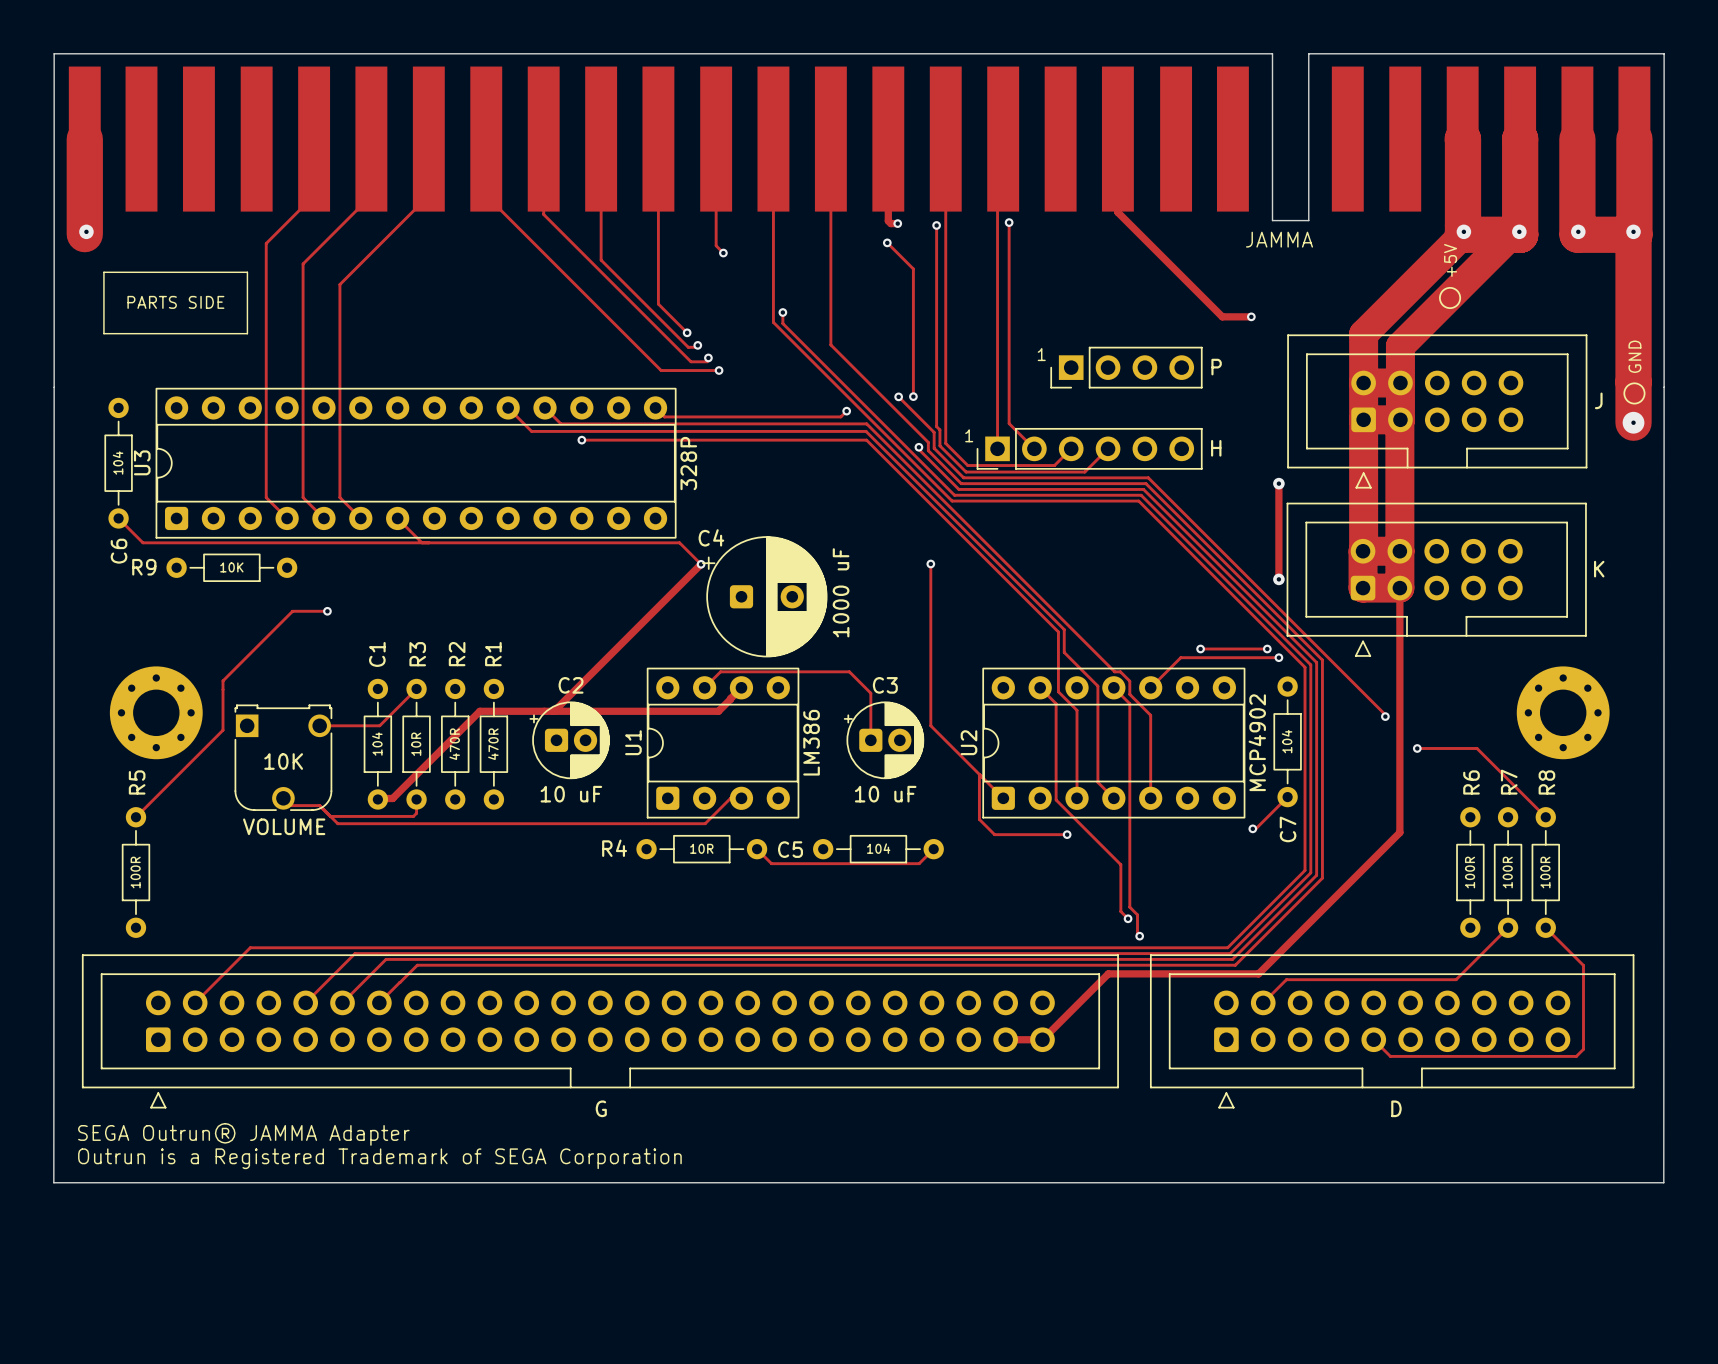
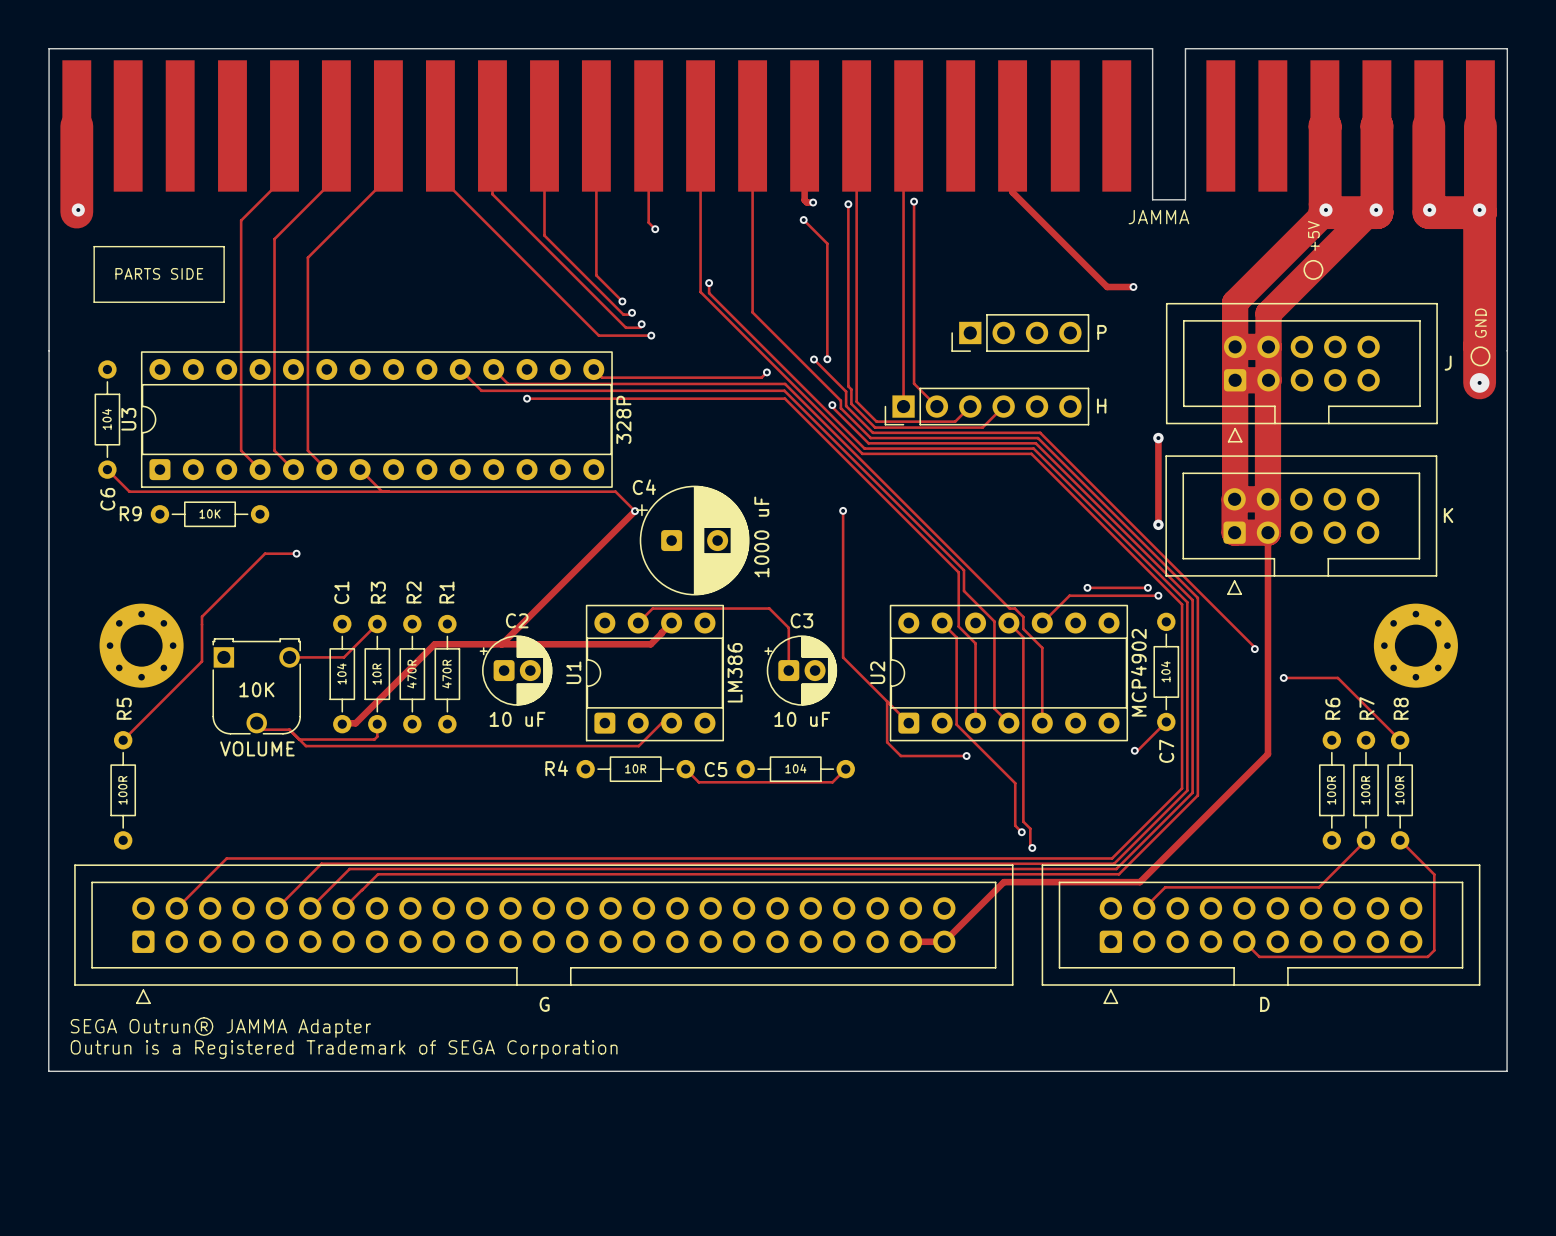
text: 1 (1041, 354) -> none
text: 1 (969, 435) -> none

